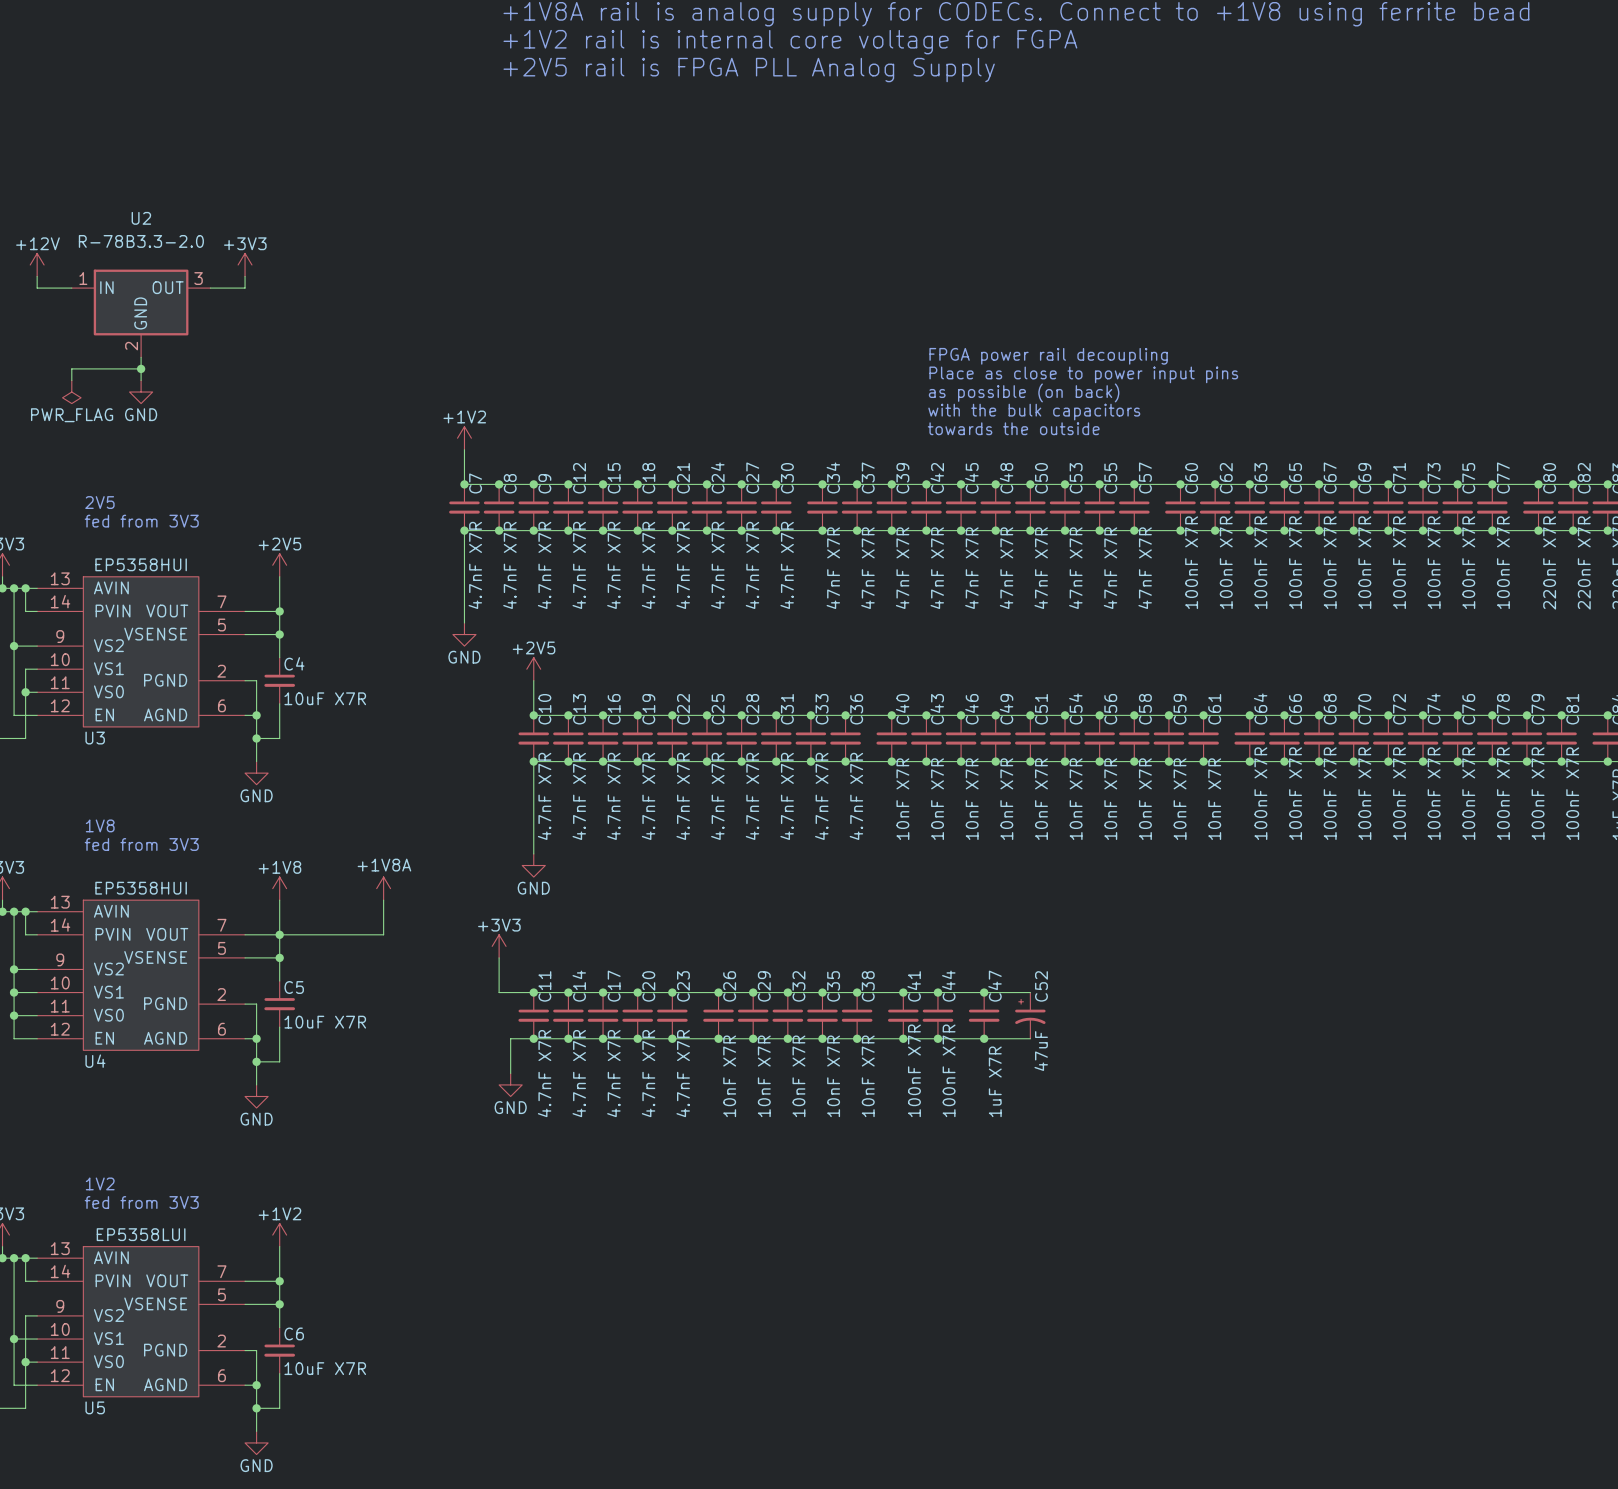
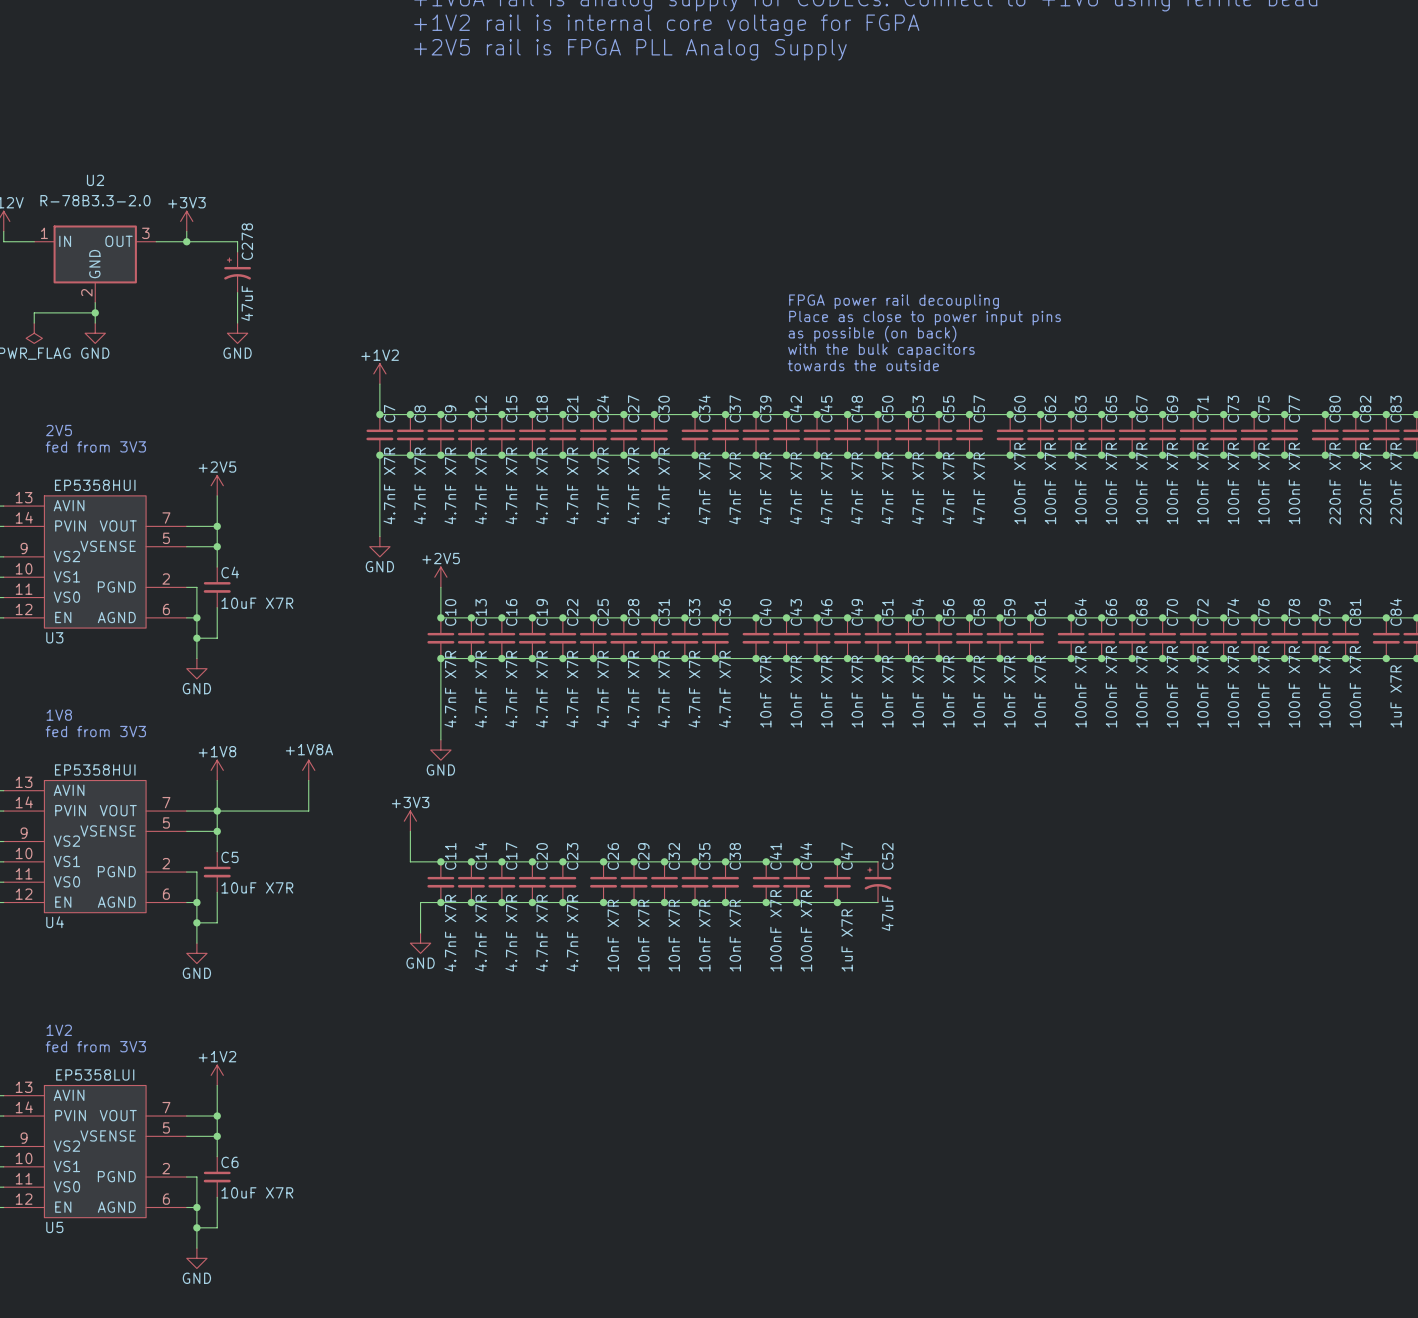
wire: none -> (186, 241) (237, 241) (237, 251)
junction: none -> (186, 241)
C278: none -> 47uF (237, 272)
wire: none -> (237, 292) (237, 323)
power symbol: none -> GND (237, 333)

